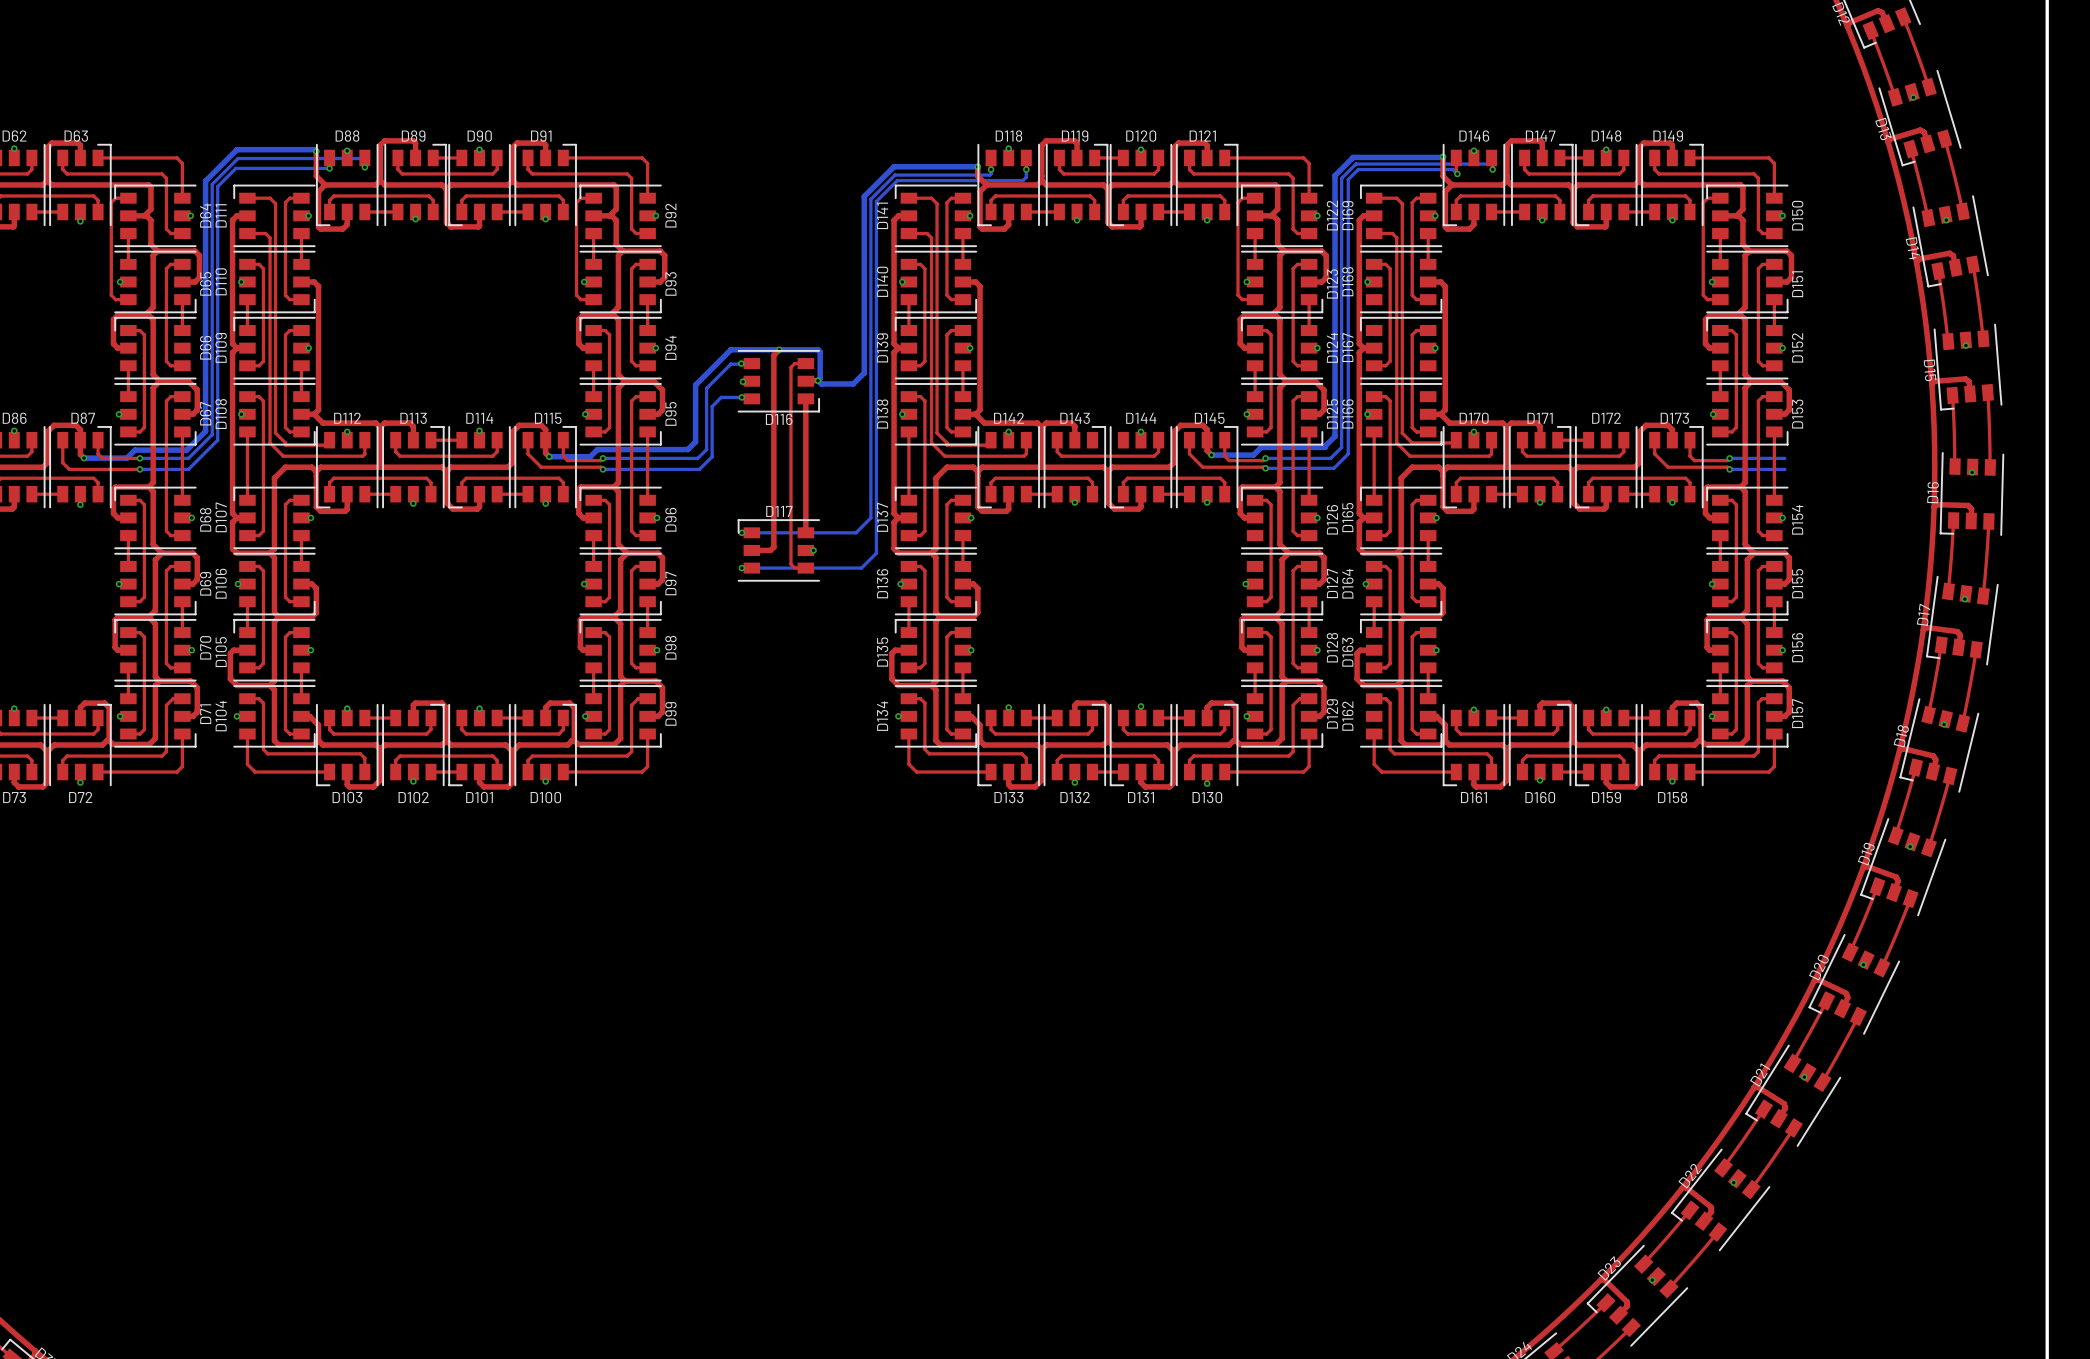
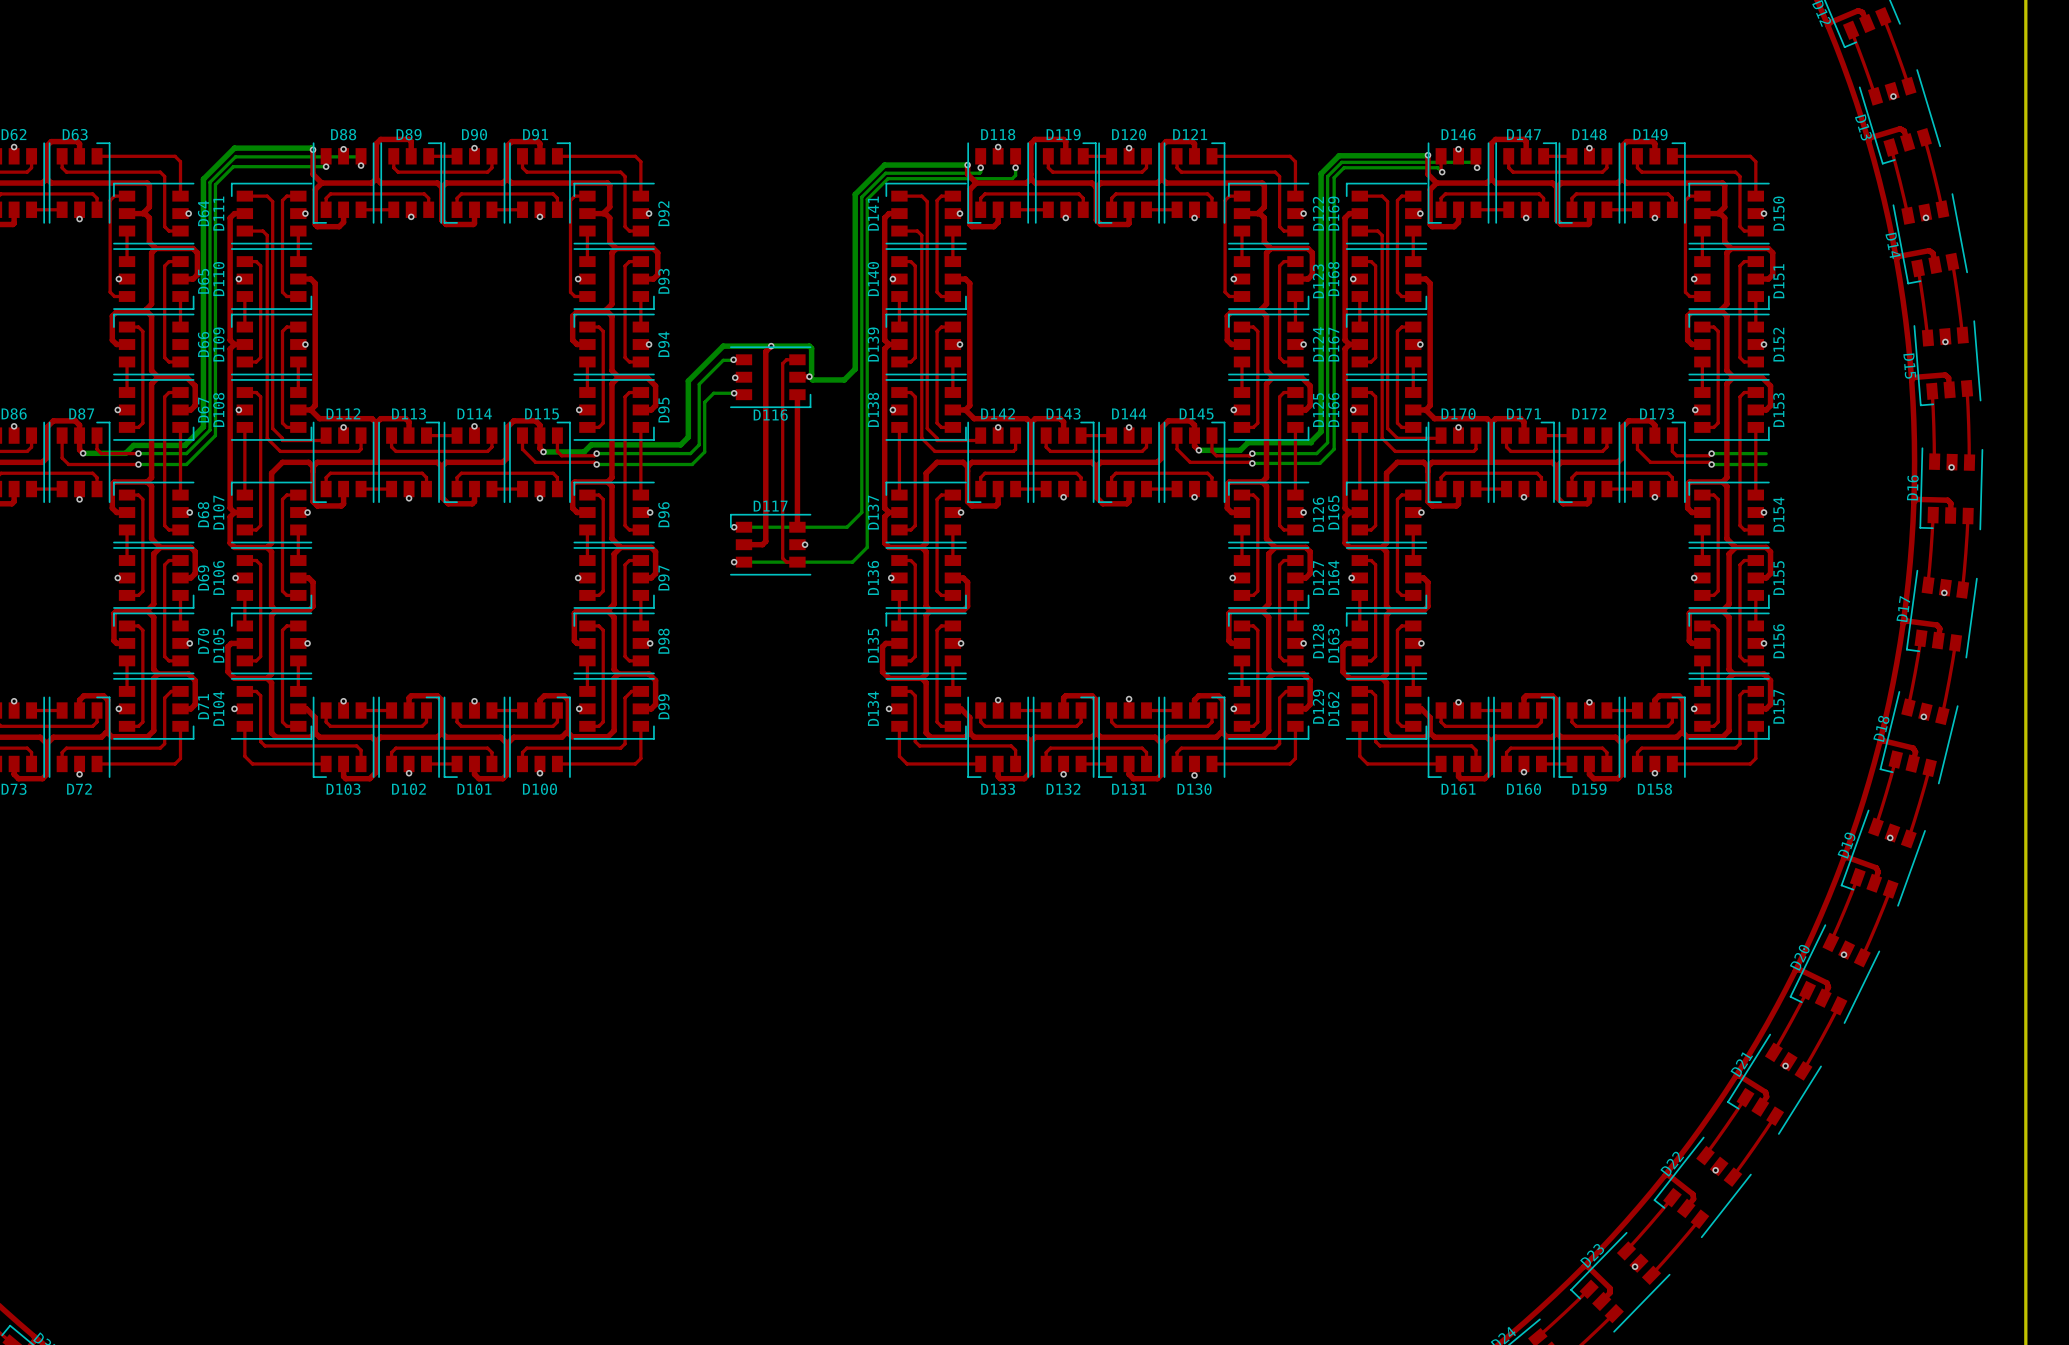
top track: none -> (1359, 296) (1359, 327)
top track: none -> (1413, 361) (1413, 392)
top track: none -> (1081, 435) (1111, 435)
top track: none -> (1241, 529) (1241, 560)

